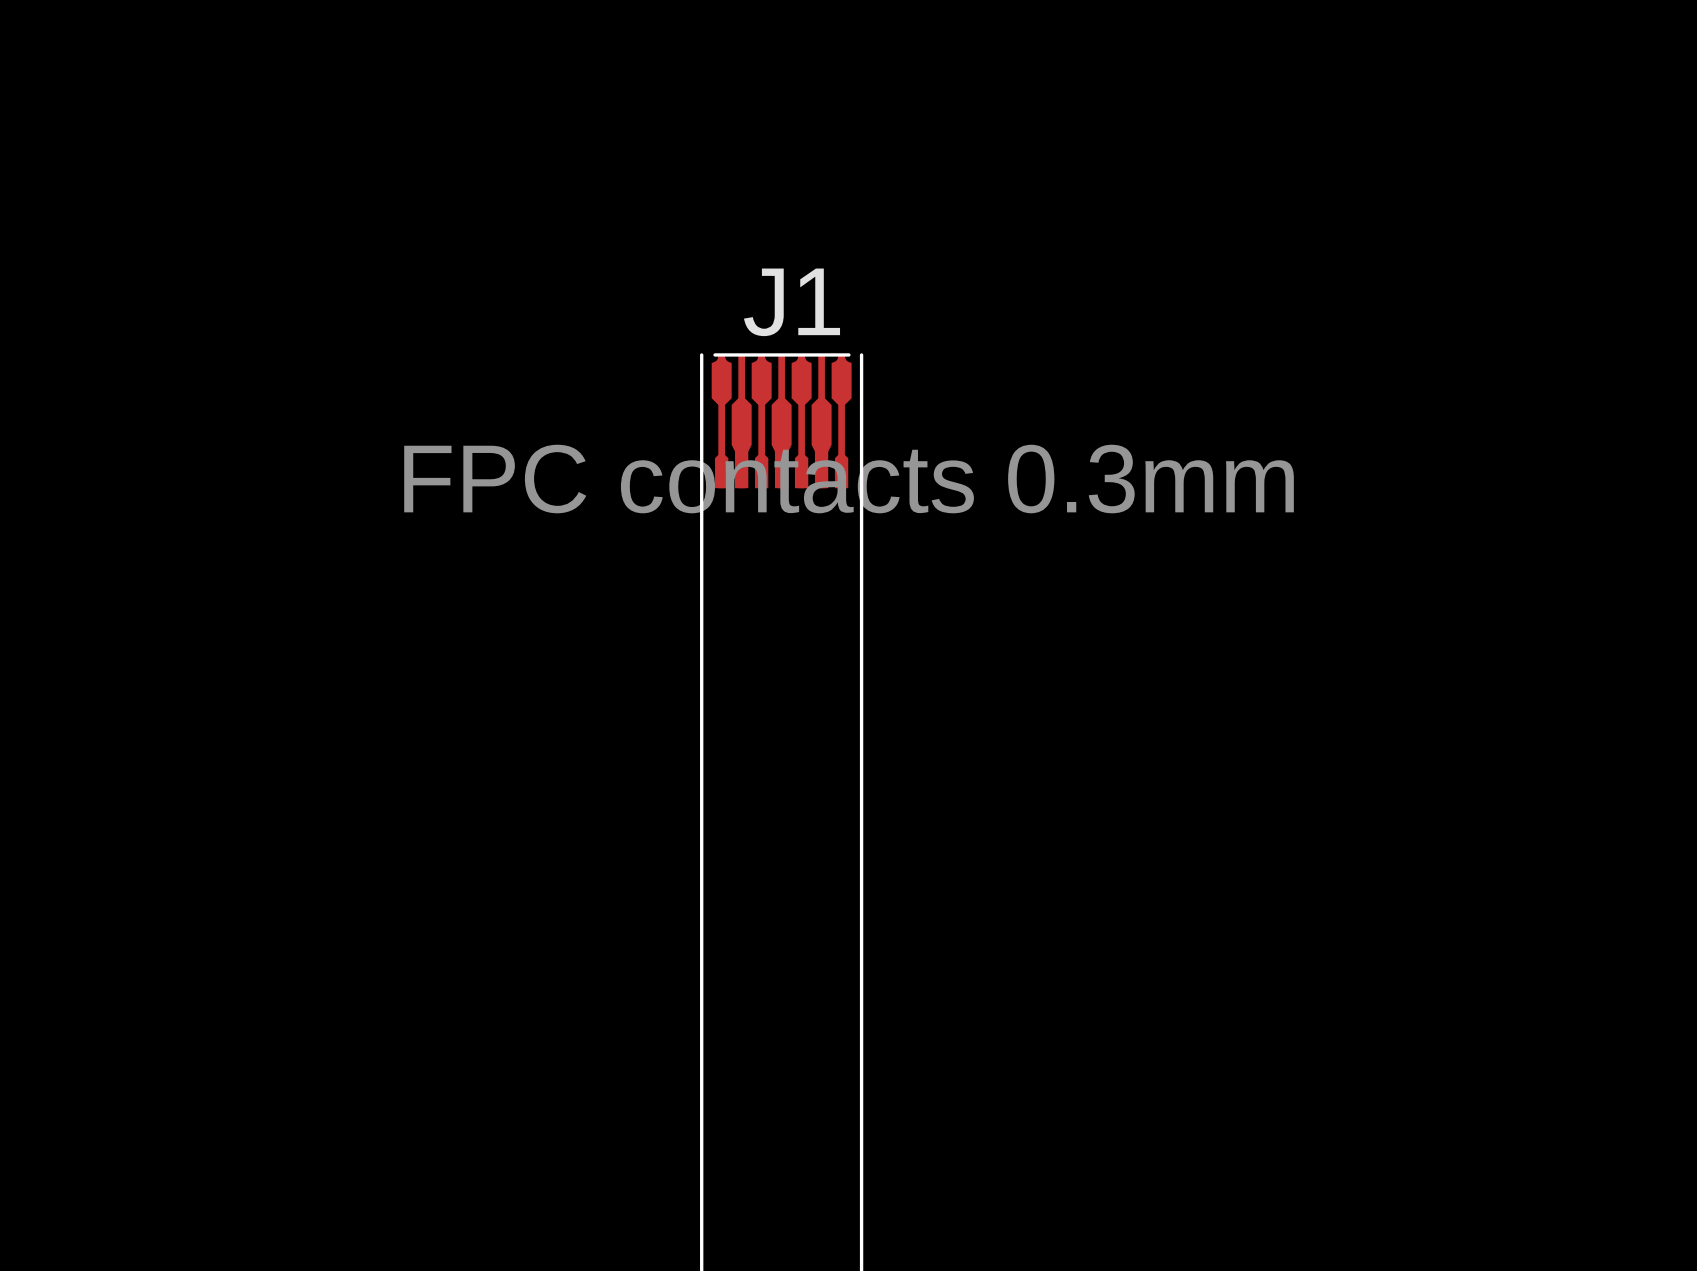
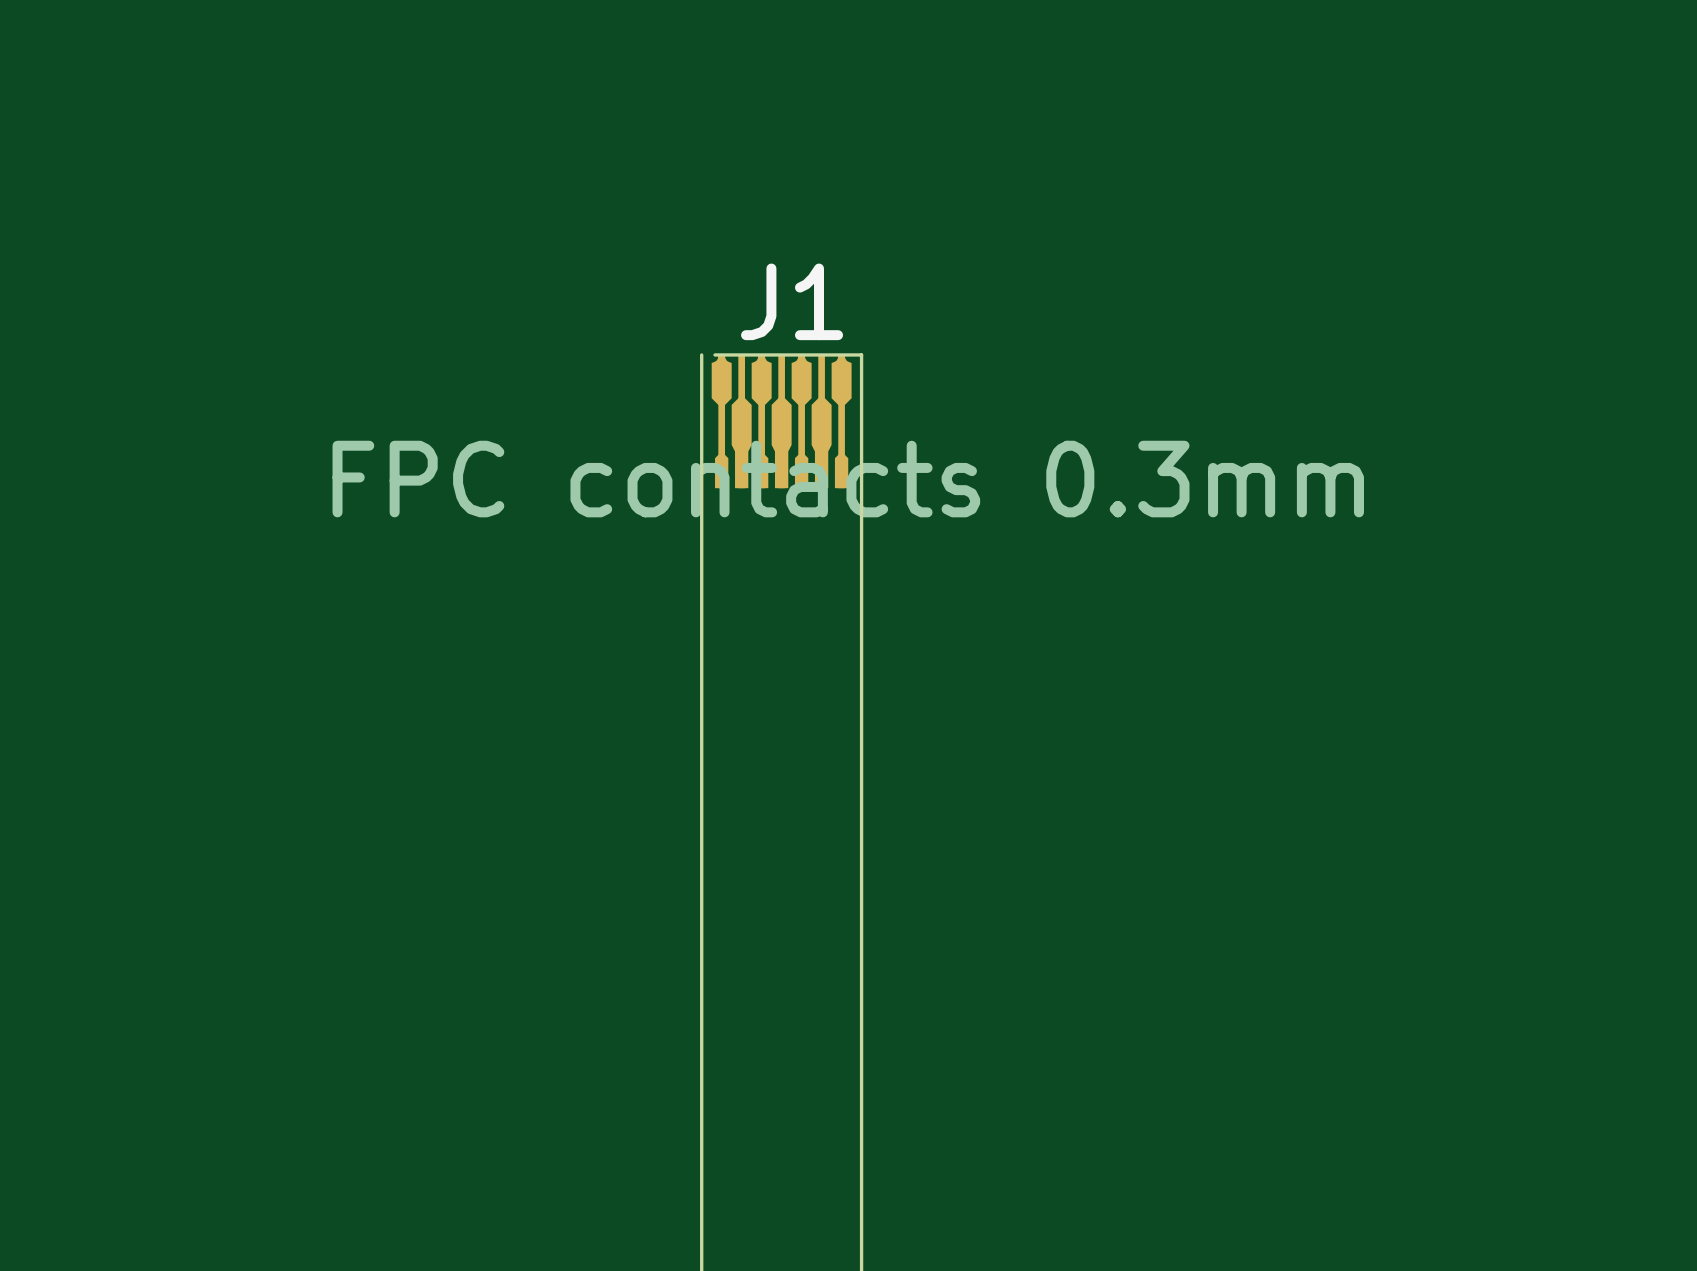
board edge: none -> (848, 354) (861, 354)

